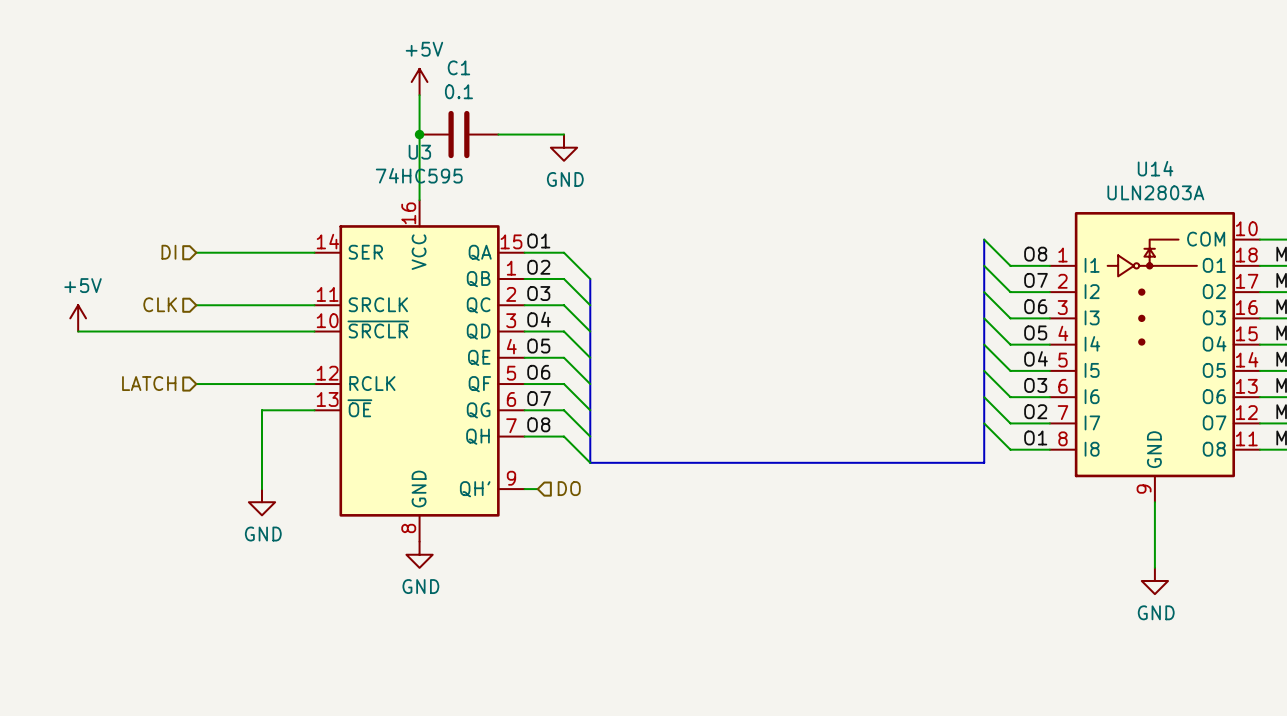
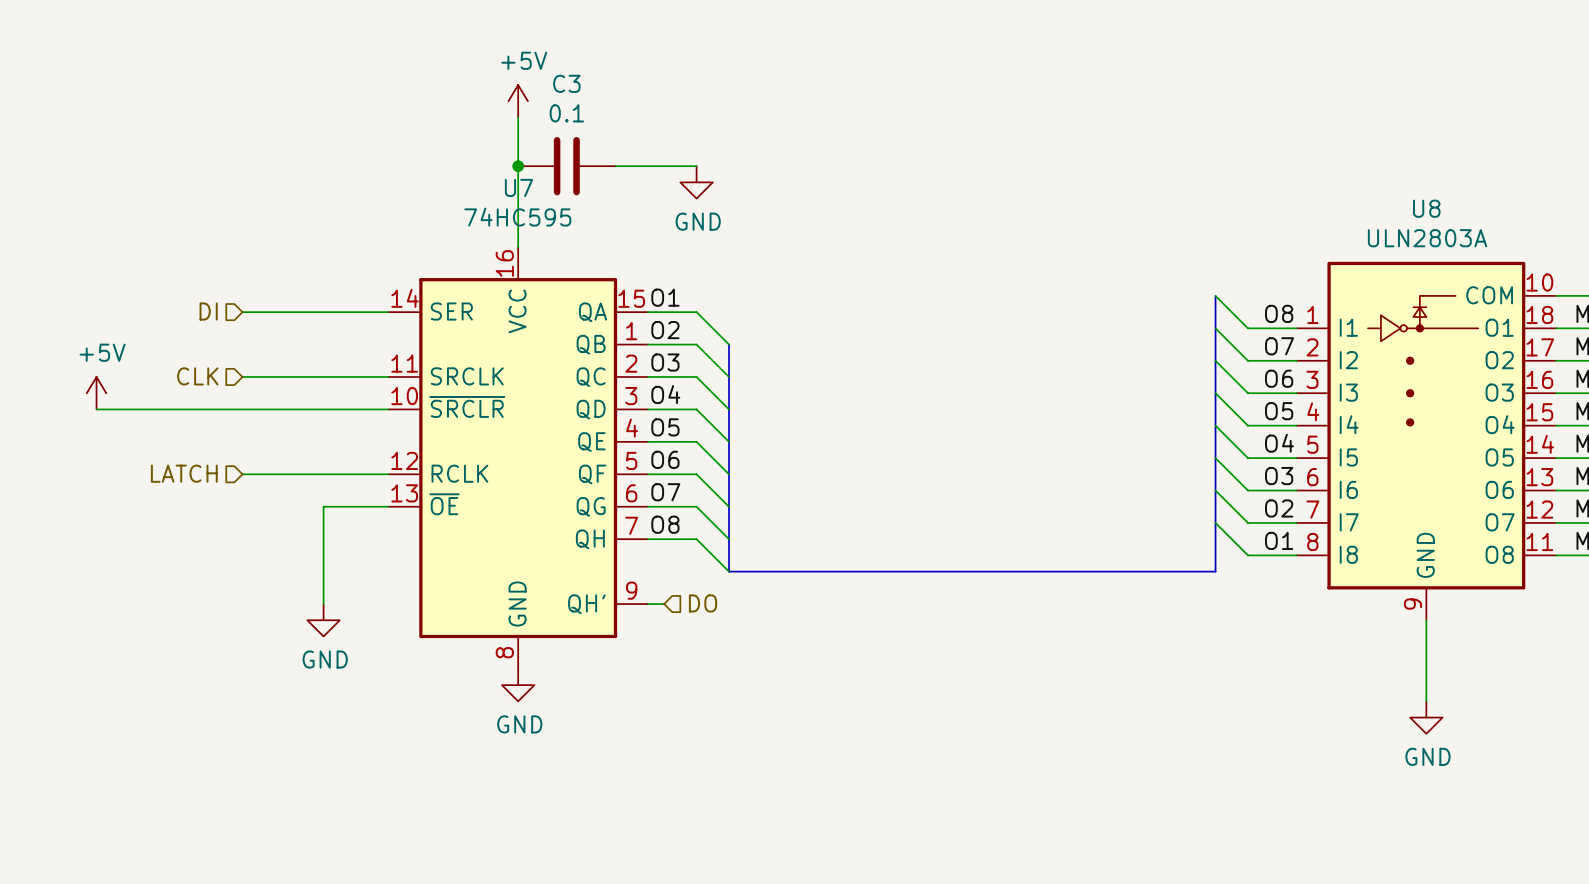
C1 name: C1 (458, 67) -> C3 (566, 83)
U3 name: U3 (419, 152) -> U7 (518, 187)
U14 name: U14 (1155, 168) -> U8 (1426, 208)

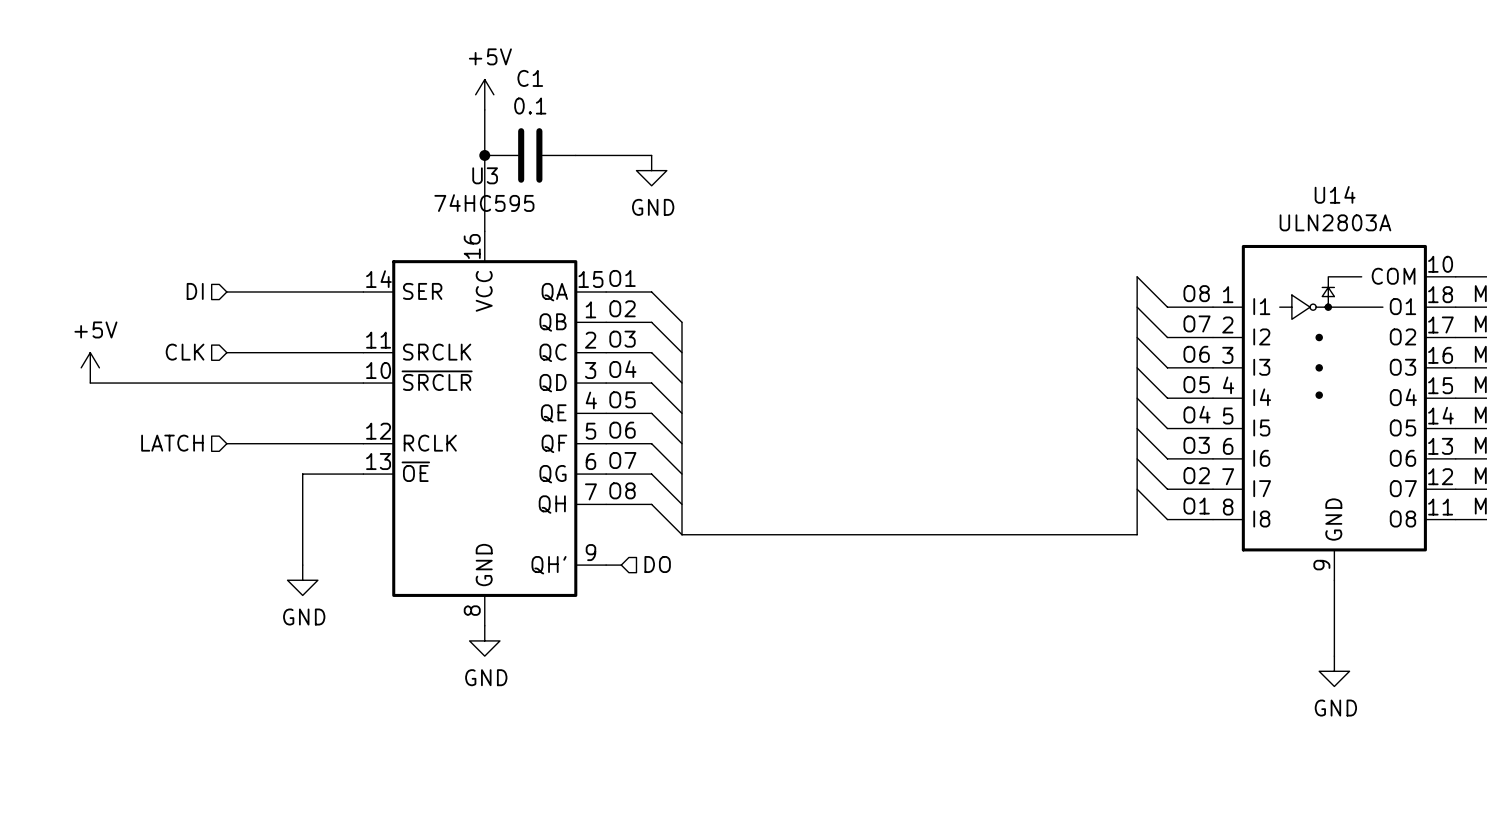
C3 name: C3 (566, 83) -> C1 (530, 78)
U7 name: U7 (518, 187) -> U3 (485, 175)
U8 name: U8 (1426, 208) -> U14 (1335, 194)

